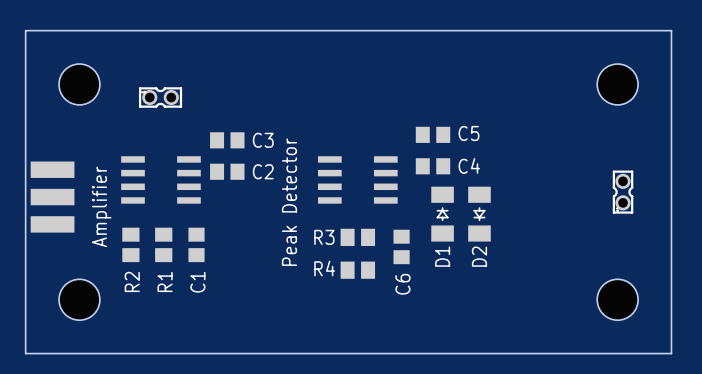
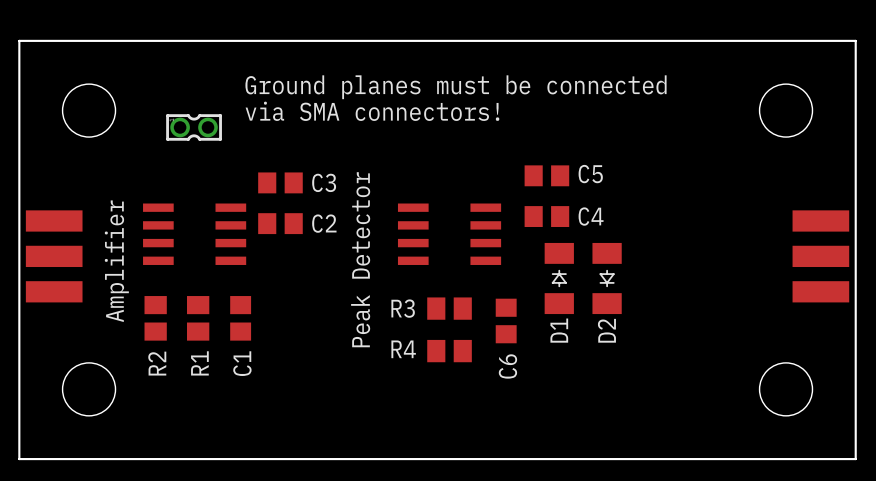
text: none -> Ground planes must be connected (456, 87)
text: none -> via SMA connectors! (372, 111)
part: (623, 192) -> none
part: none -> (820, 256)

